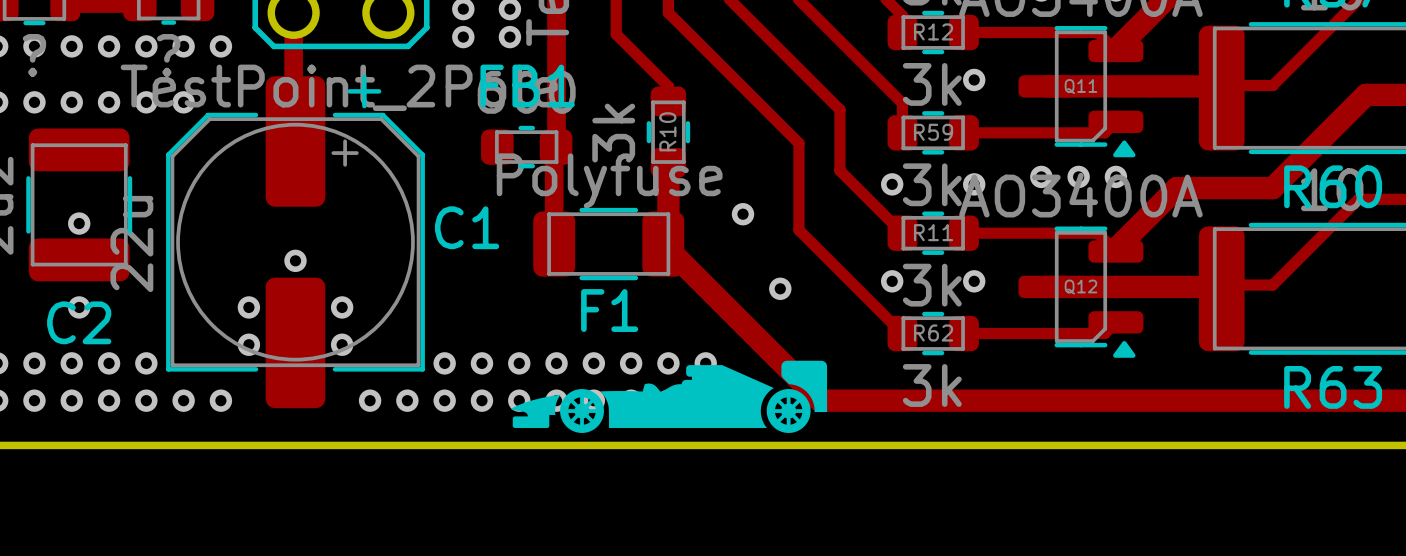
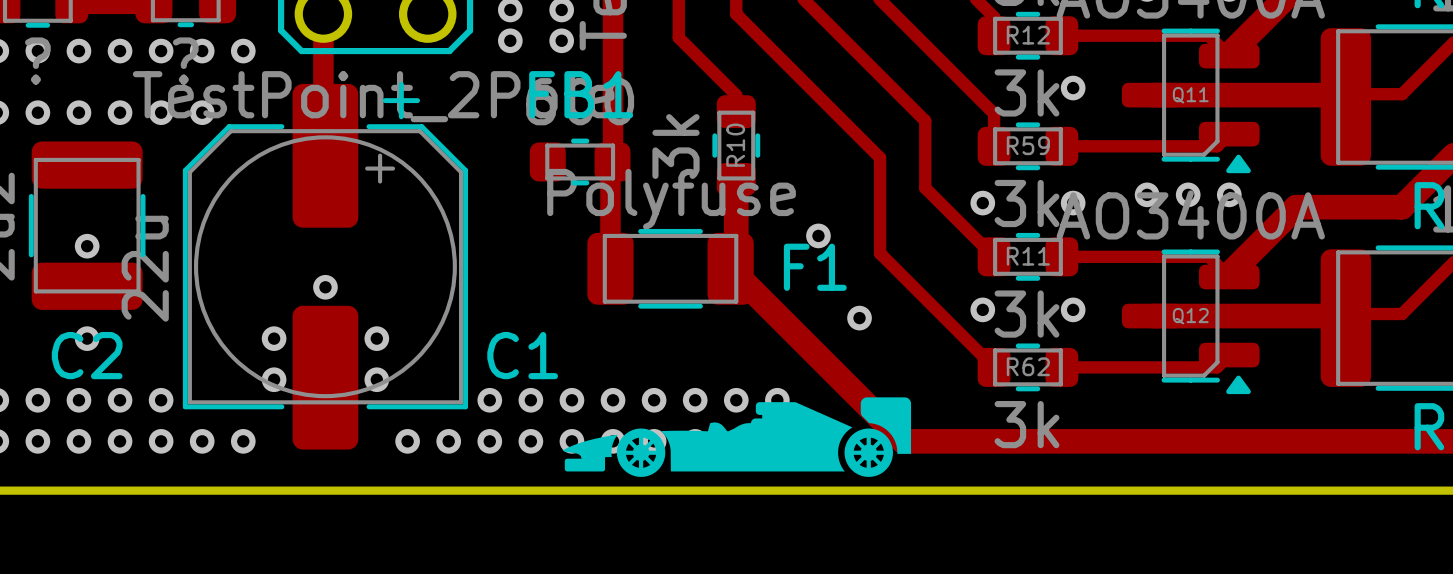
C1 name position: C1 (467, 227) -> C1 (522, 355)
F1 name position: F1 (609, 310) -> F1 (815, 267)

